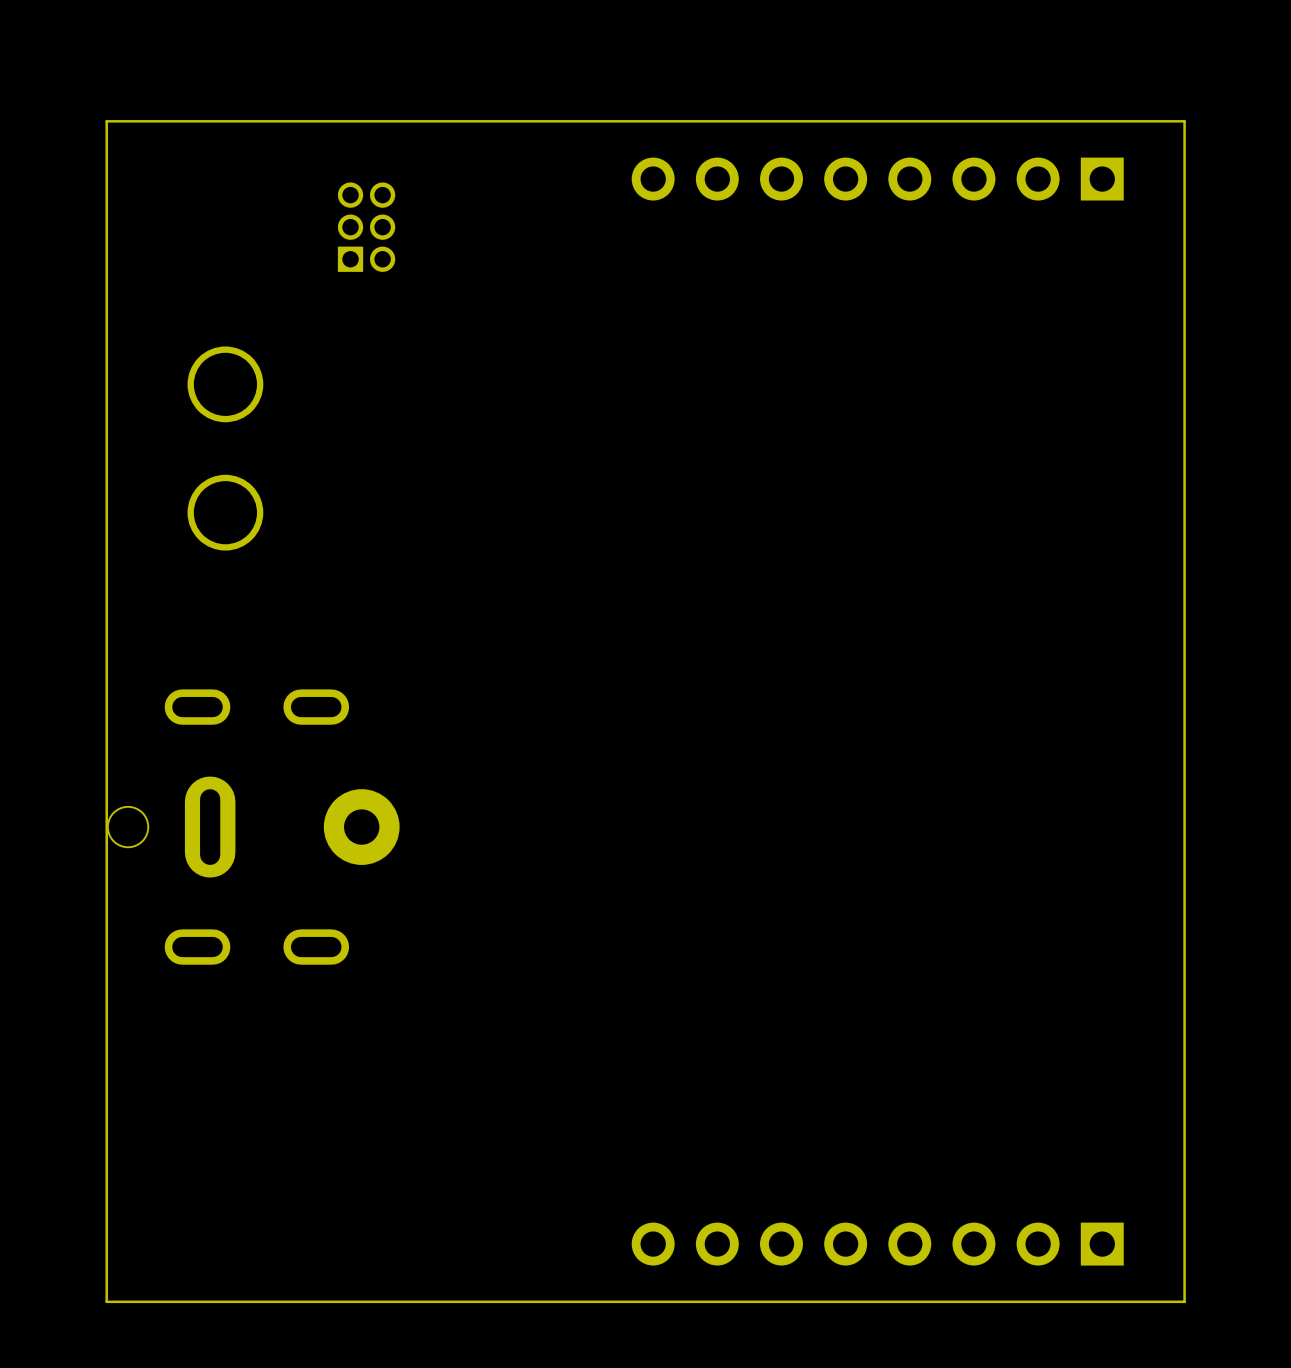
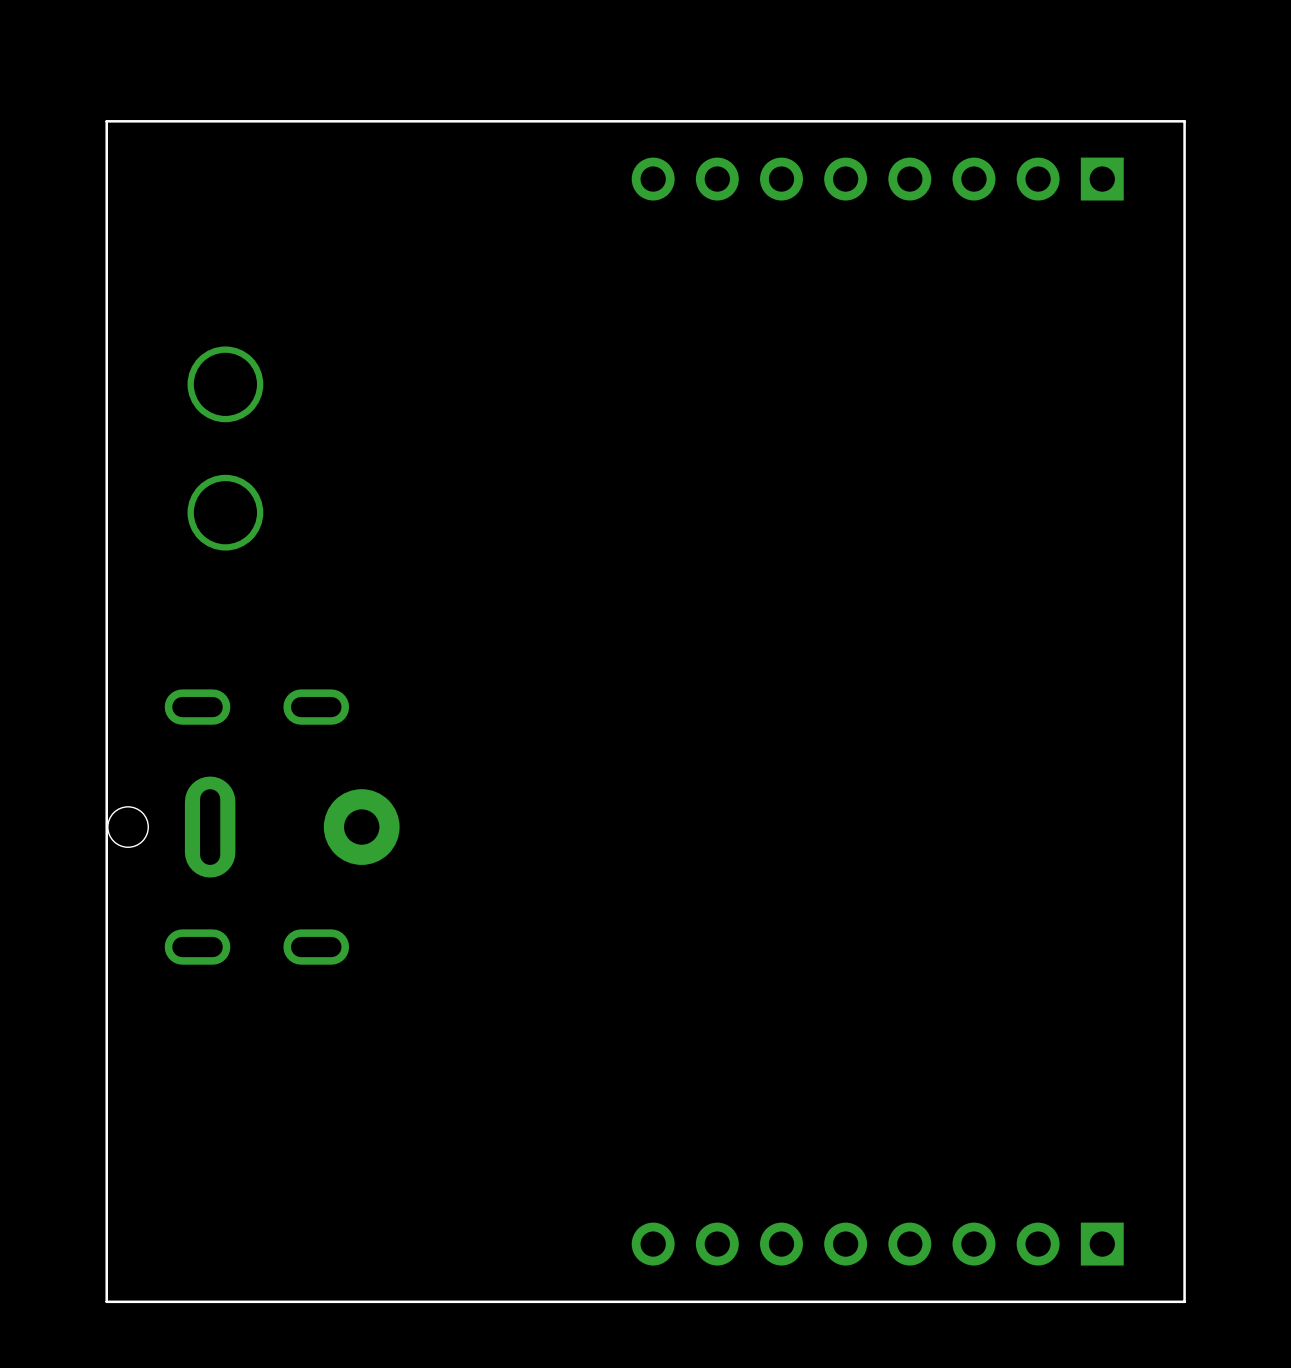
part: (366, 227) -> none

